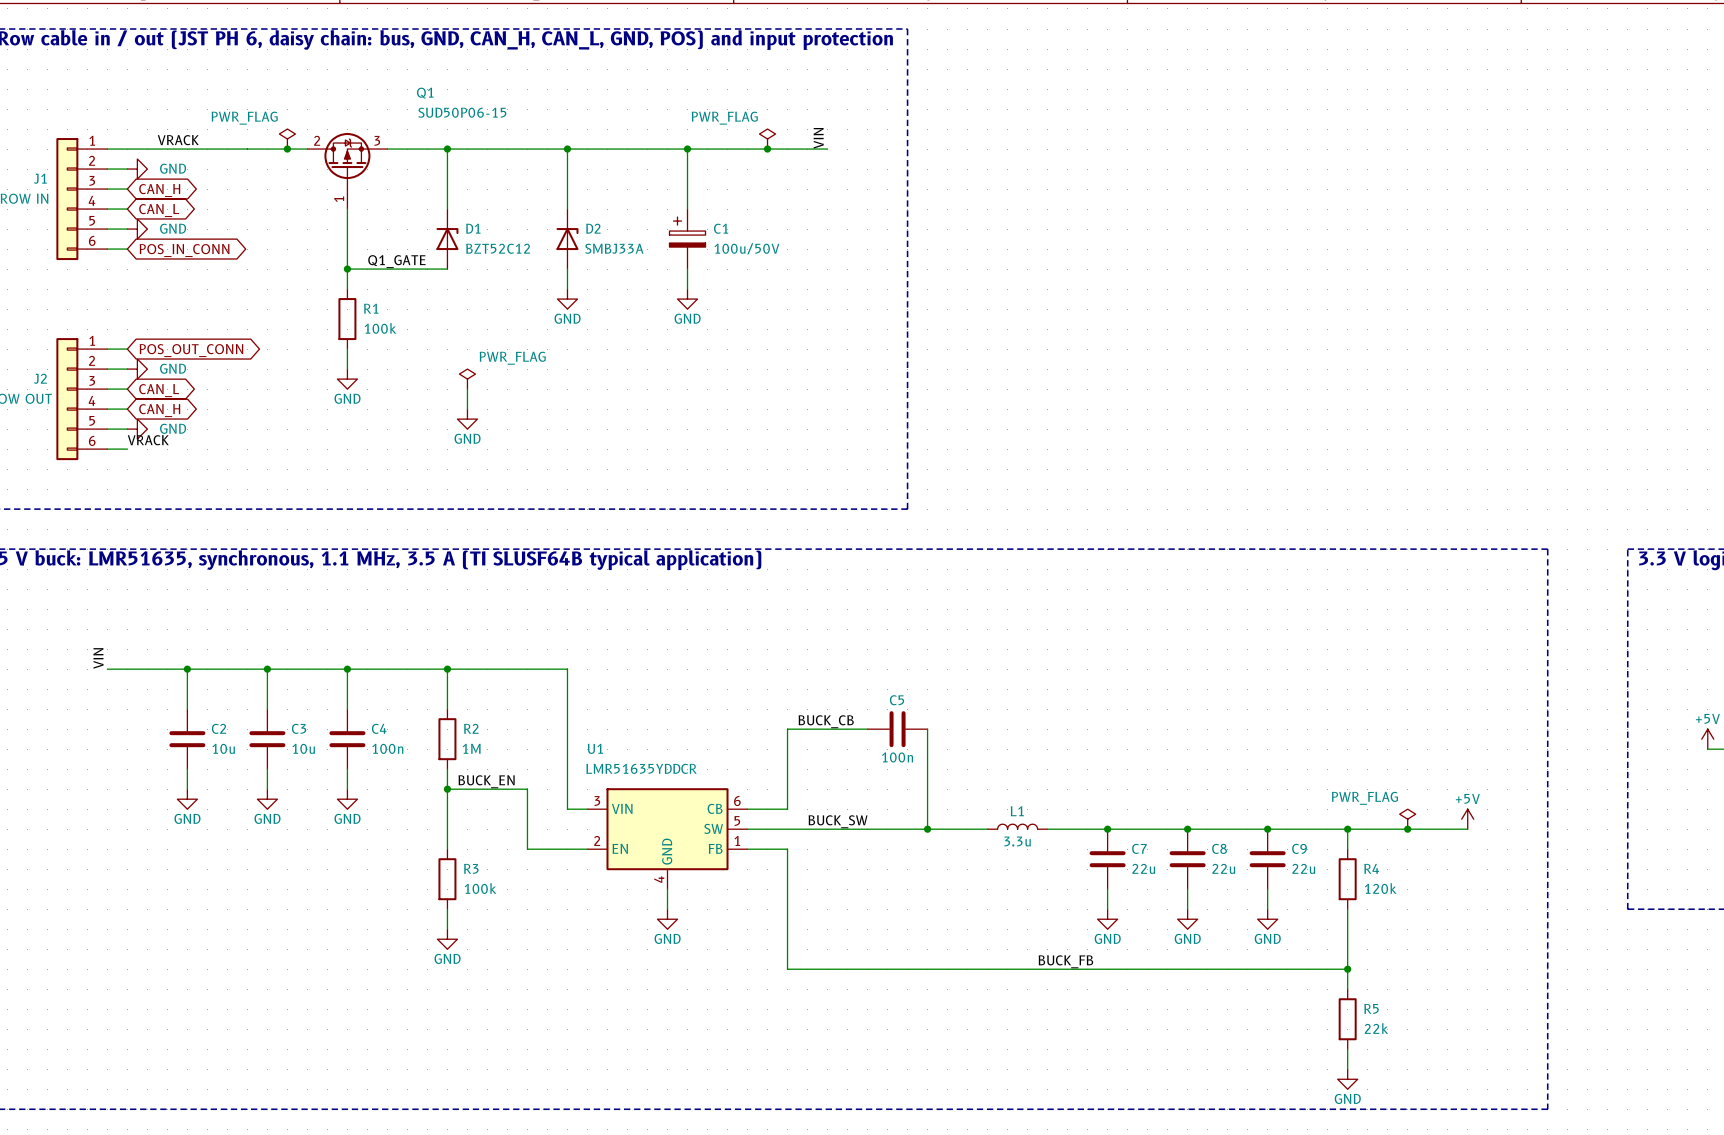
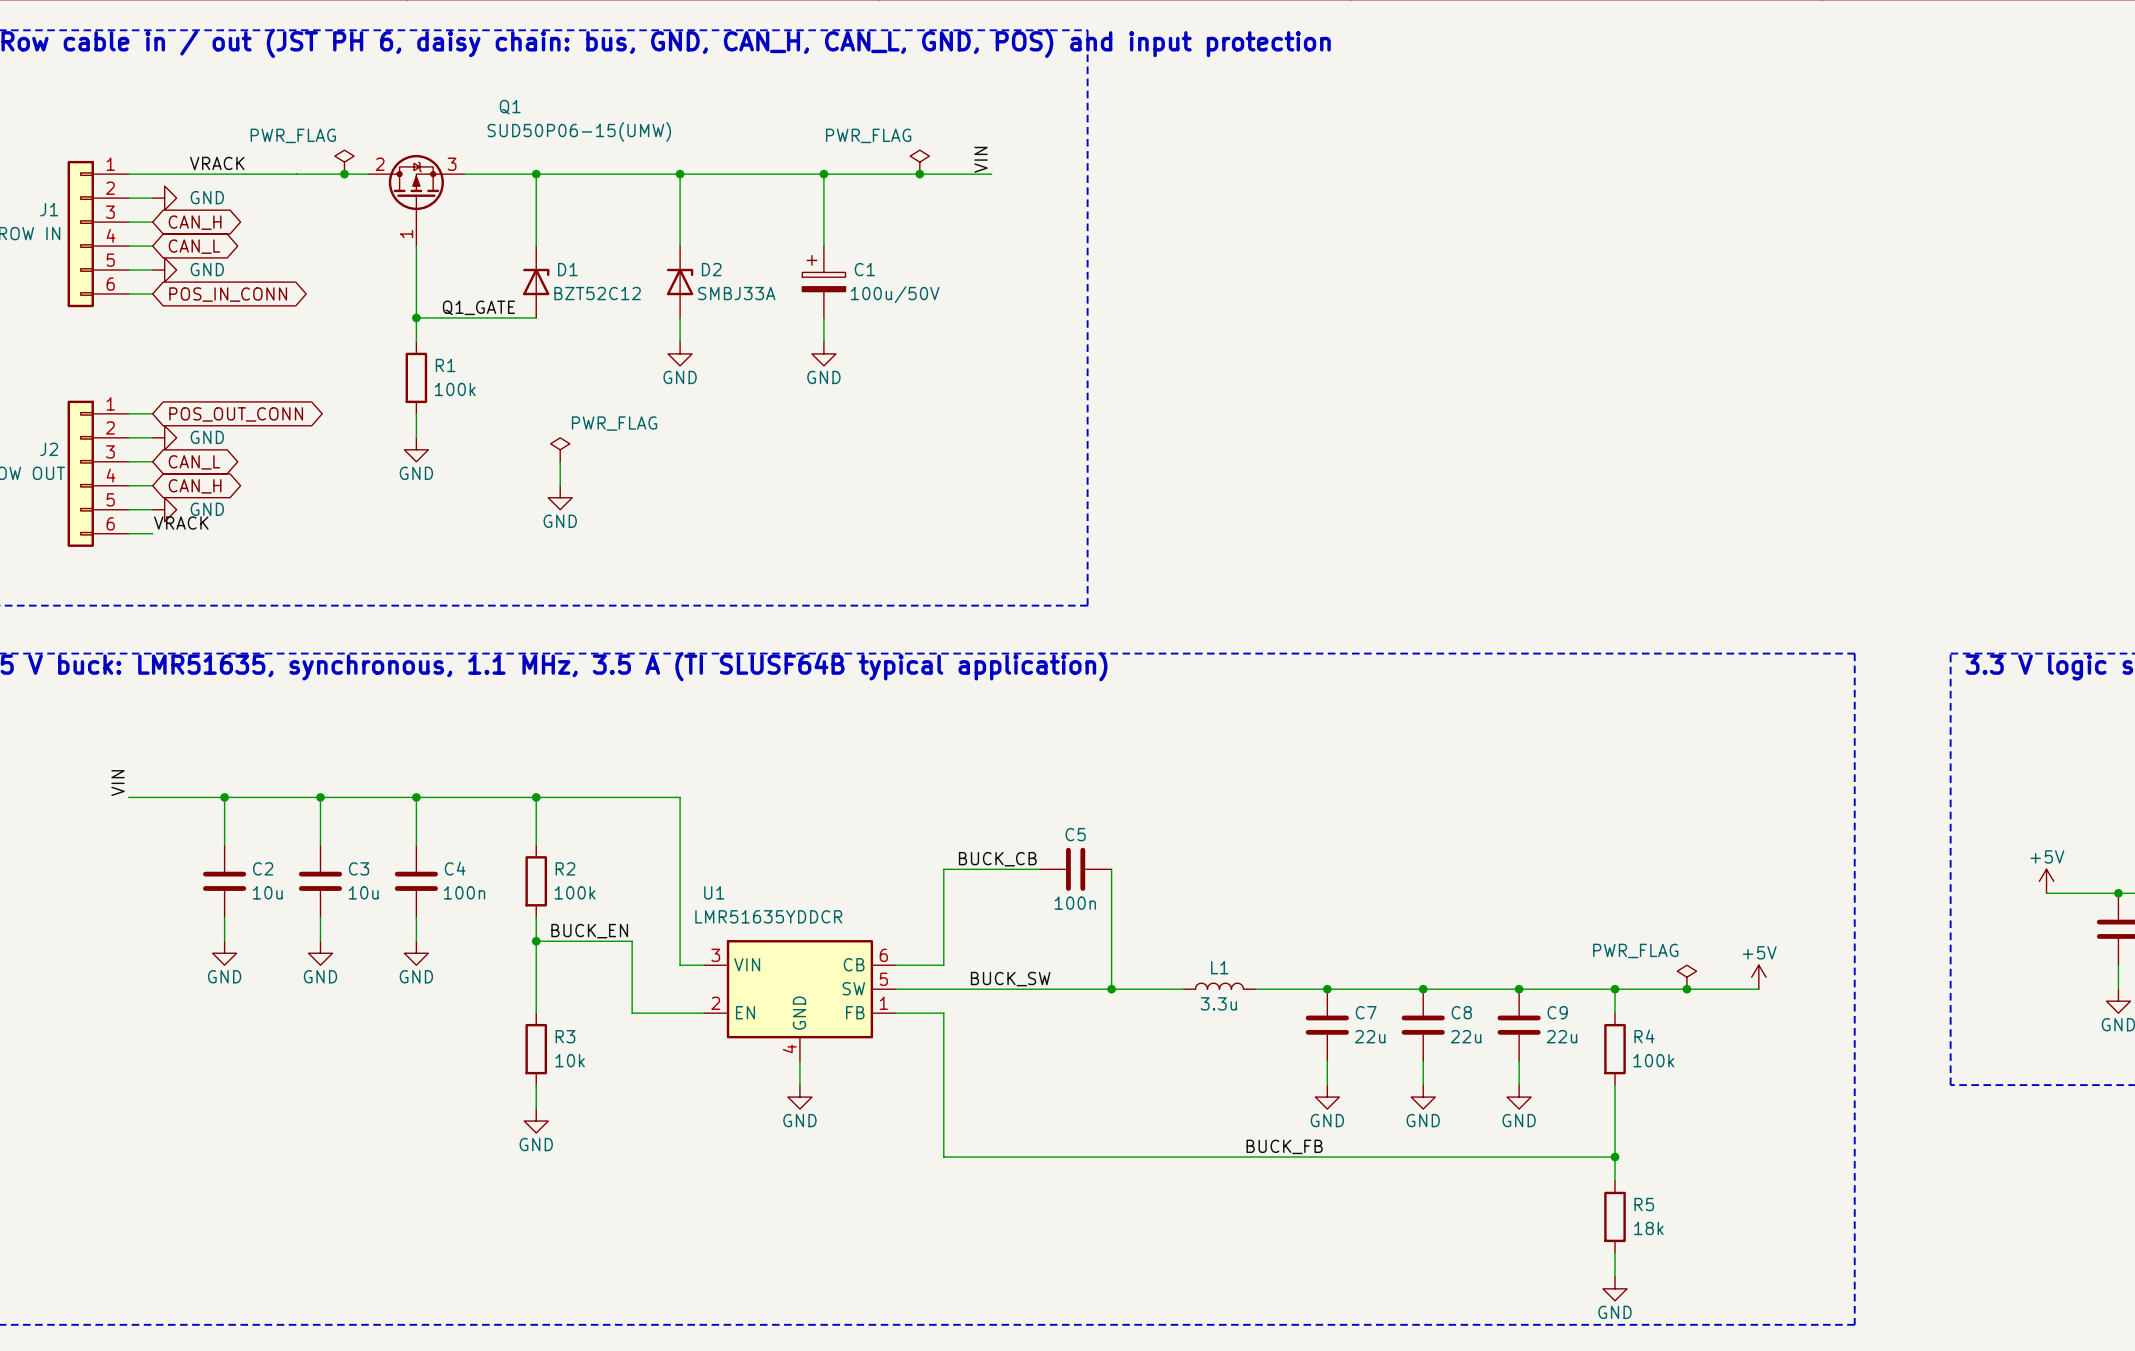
Q1 value: SUD50P06-15 (462, 112) -> SUD50P06-15(UMW) (579, 131)
R2 value: 1M (471, 748) -> 100k (575, 892)
R3 value: 100k (480, 888) -> 10k (570, 1060)
R4 value: 120k (1380, 888) -> 100k (1653, 1060)
R5 value: 22k (1376, 1028) -> 18k (1648, 1228)

